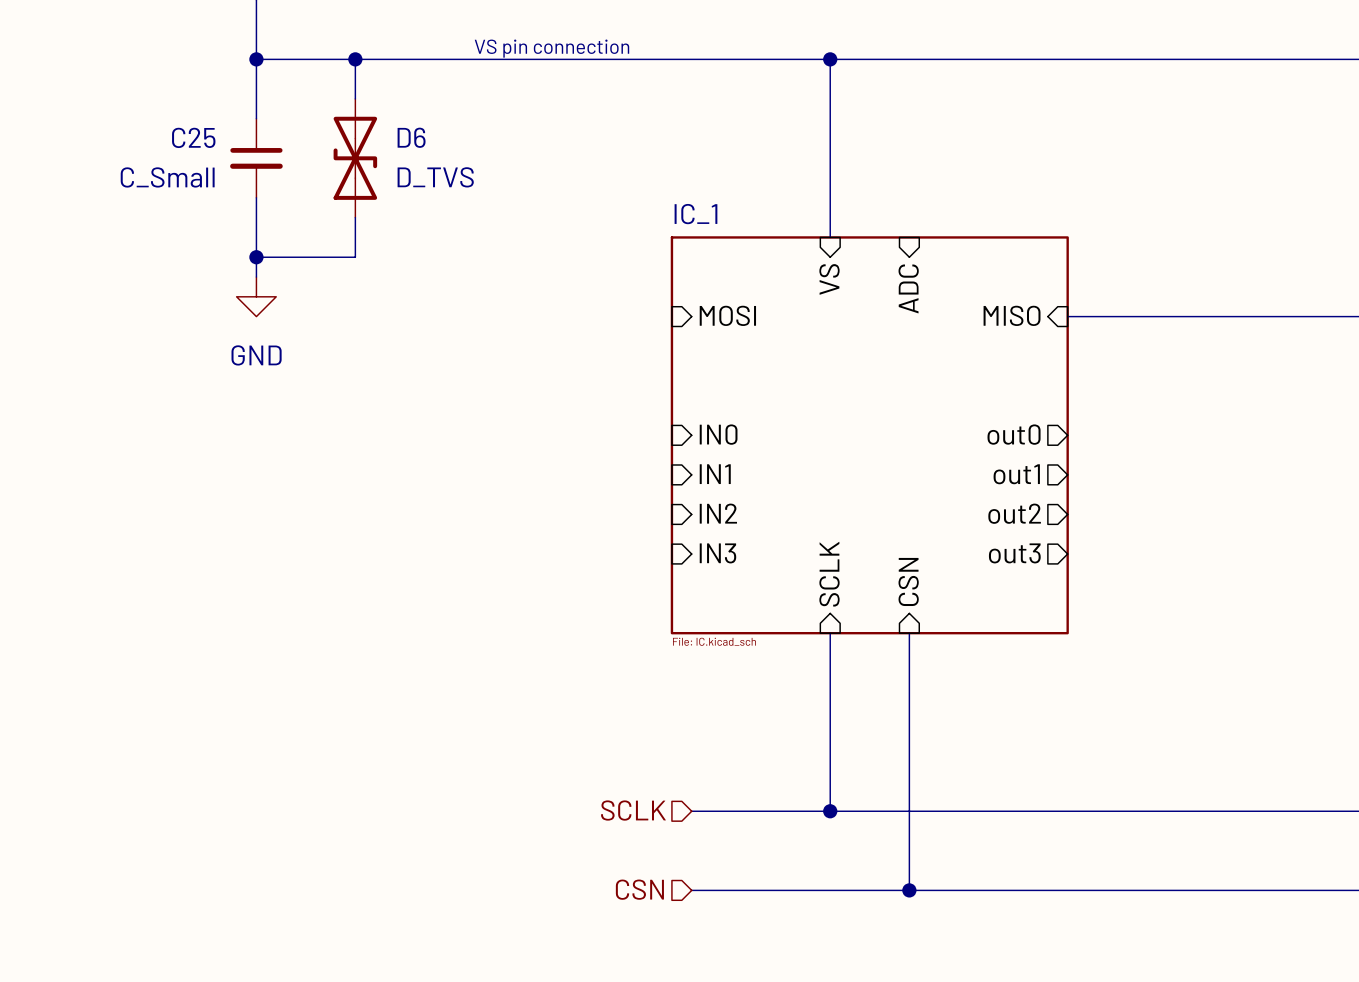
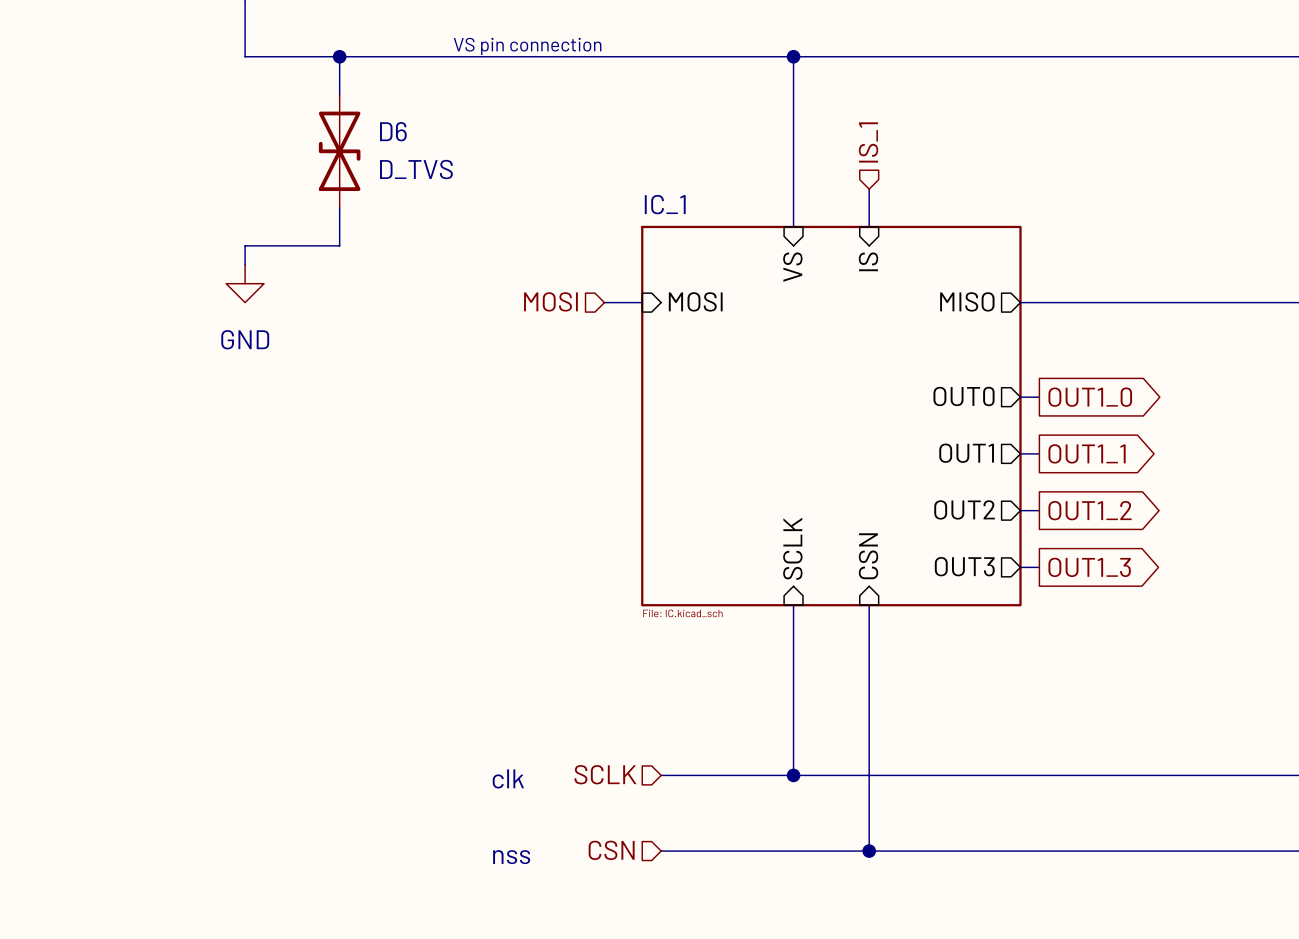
wire: (256, 59) (256, 118) -> none
junction: (256, 59) -> none
hierarchical label: none -> IS_1 (868, 142)
C25: C_Small (256, 158) -> none
wire: (256, 197) (256, 257) -> none
wire: none -> (869, 189) (869, 226)
junction: (256, 257) -> none
sheet pin: ADC (908, 288) -> IS (868, 261)
hierarchical label: none -> MOSI (550, 301)
sheet pin shape: input (1012, 315) -> output (967, 301)
wire: none -> (604, 302) (642, 302)
sheet pin: none -> OUT0 (964, 396)
wire: none -> (1020, 397) (1039, 397)
global label: none -> OUT1_0 (1090, 397)
sheet pin: IN0 (718, 434) -> none
sheet pin: out0 (1014, 434) -> none
sheet pin: IN1 (715, 474) -> none
sheet pin: out1 (1016, 474) -> OUT1 (966, 453)
wire: none -> (1020, 453) (1039, 453)
global label: none -> OUT1_1 (1087, 453)
sheet pin: IN2 (718, 513) -> none
sheet pin: out2 (1014, 513) -> none
sheet pin: none -> OUT2 (964, 509)
wire: none -> (1020, 510) (1039, 510)
global label: none -> OUT1_2 (1090, 510)
sheet pin: IN3 (717, 553) -> none
sheet pin: out3 (1014, 553) -> none
sheet pin: none -> OUT3 (964, 566)
wire: none -> (1020, 567) (1039, 567)
global label: none -> OUT1_3 (1089, 567)
text: none -> clk (508, 778)
text: none -> nss (511, 857)

